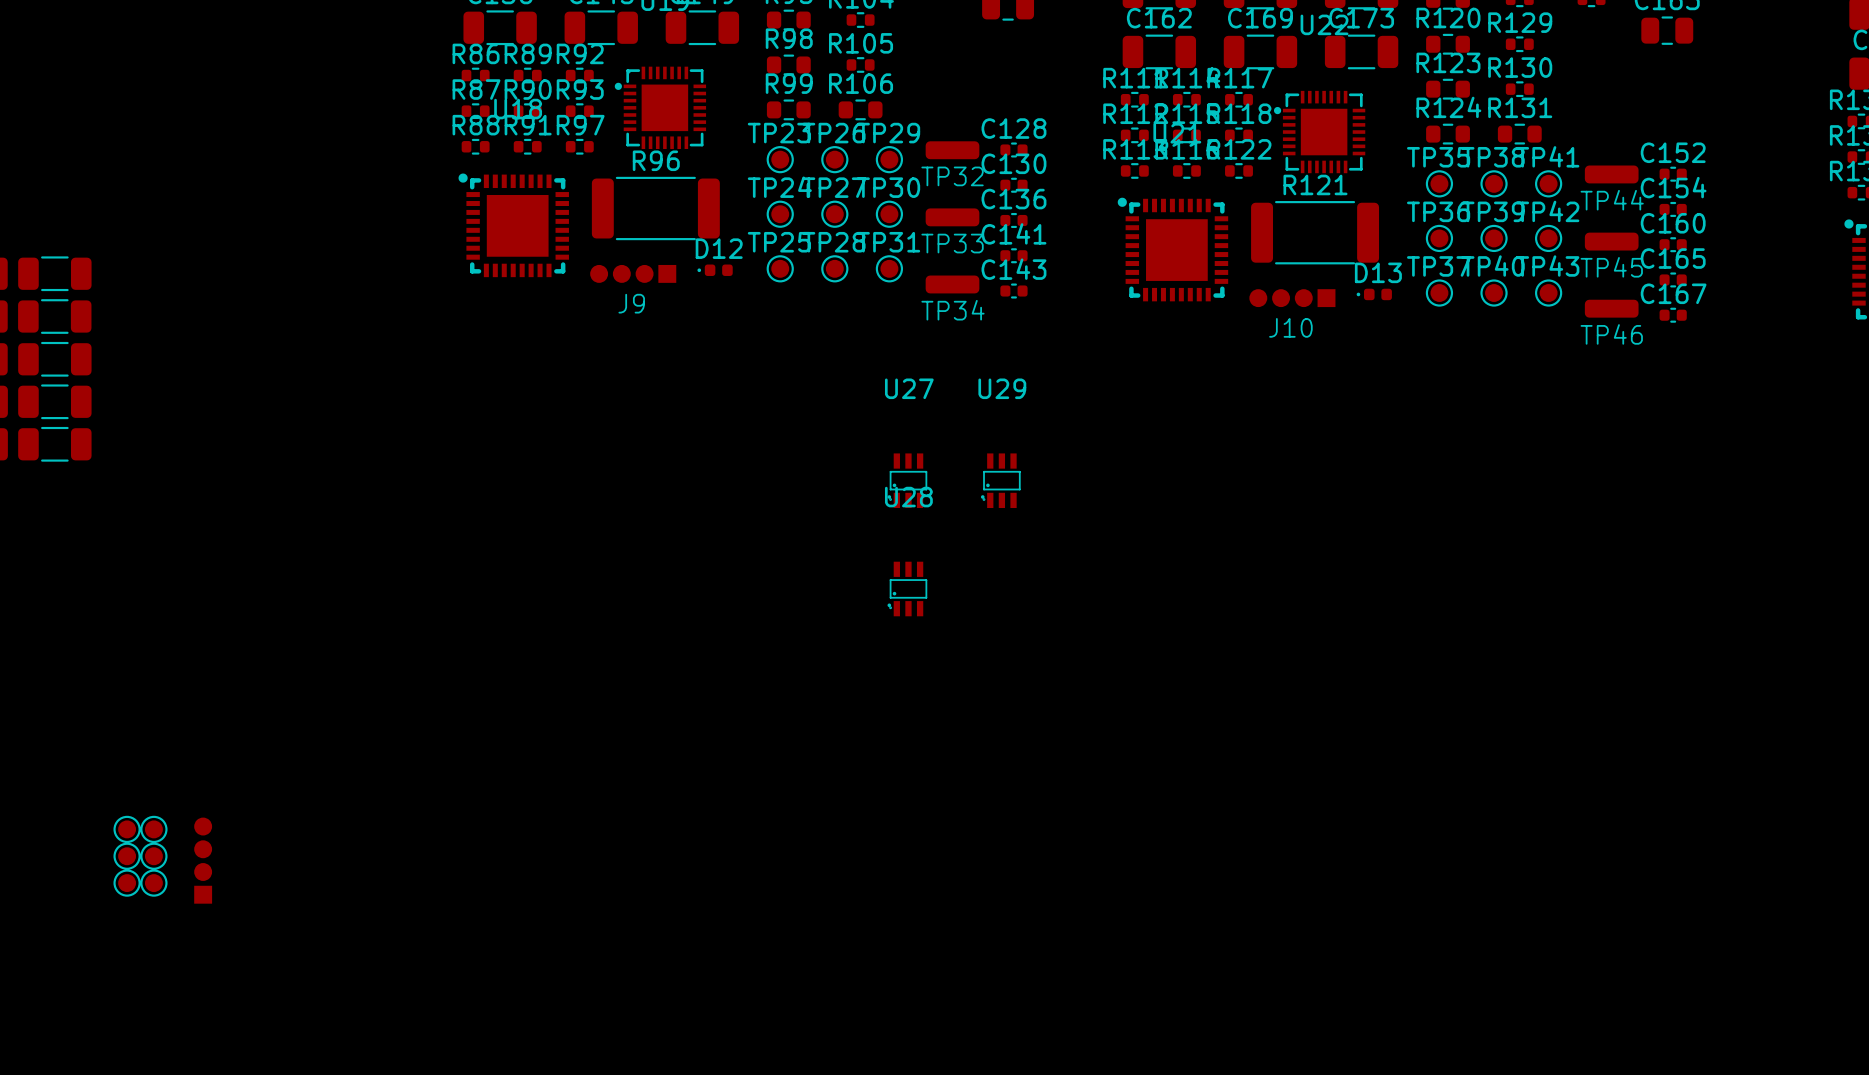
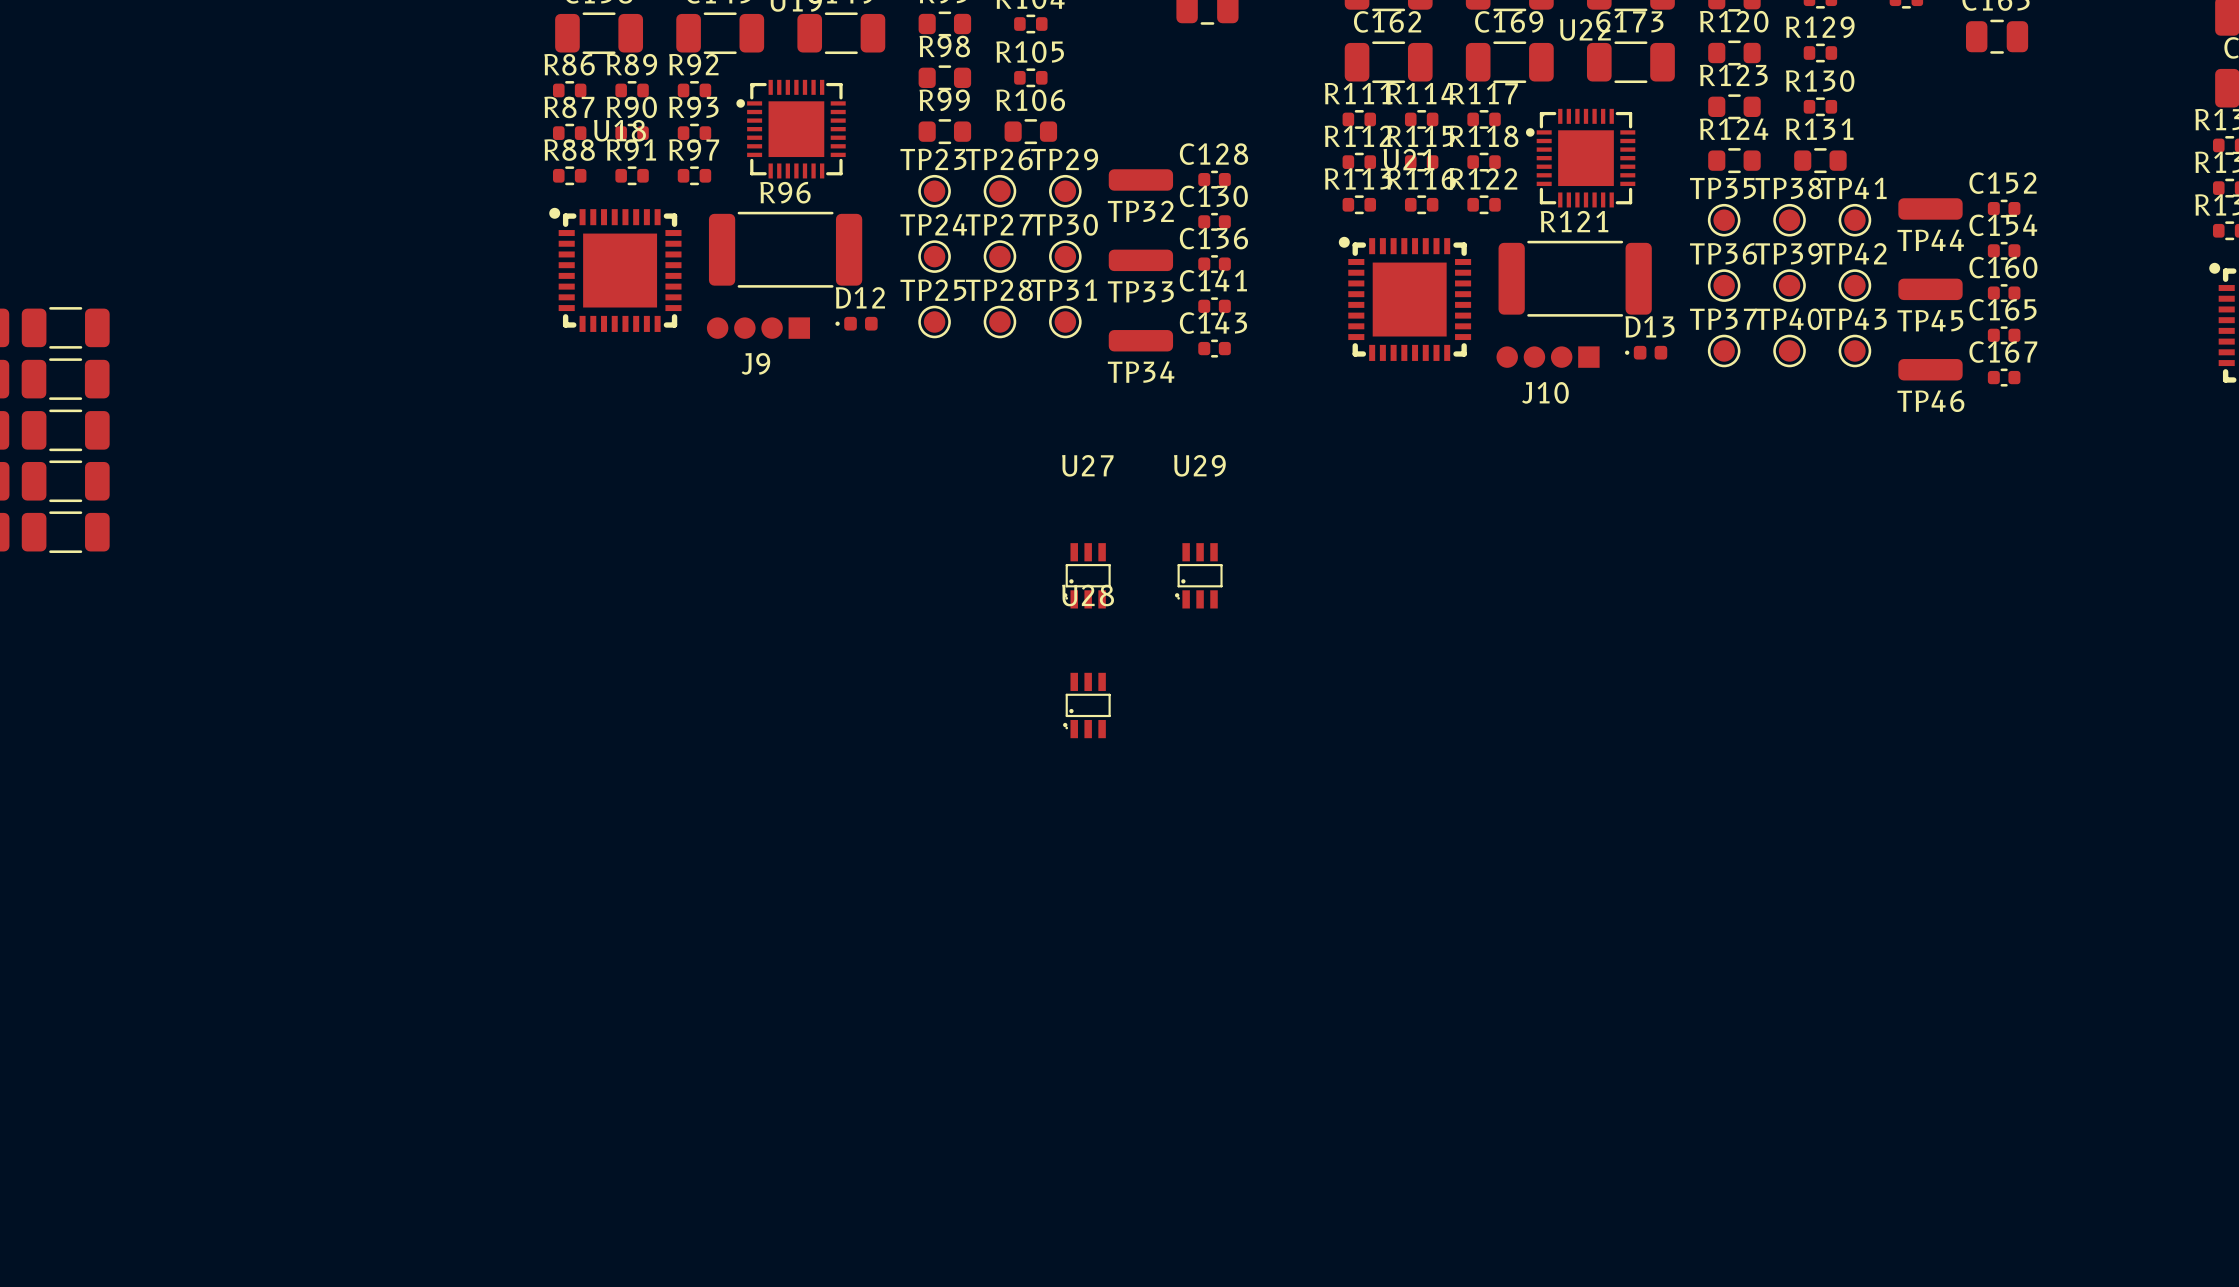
part: (127, 829) -> none
part: (153, 829) -> none
part: (127, 856) -> none
part: (153, 856) -> none
part: (203, 860) -> none
part: (127, 883) -> none
part: (153, 883) -> none

